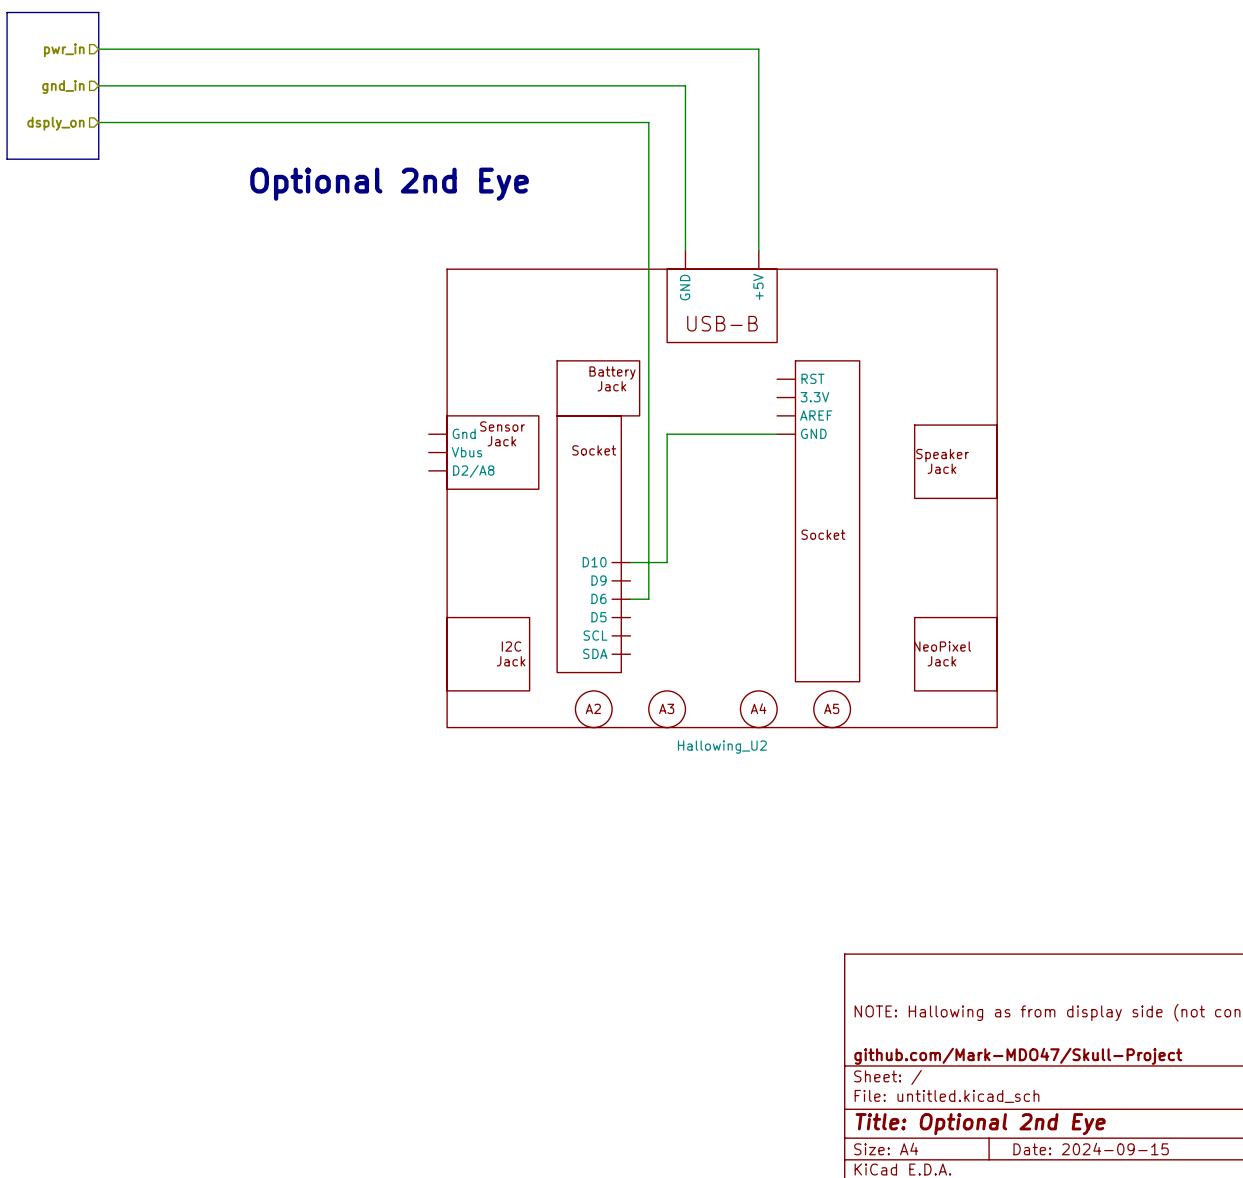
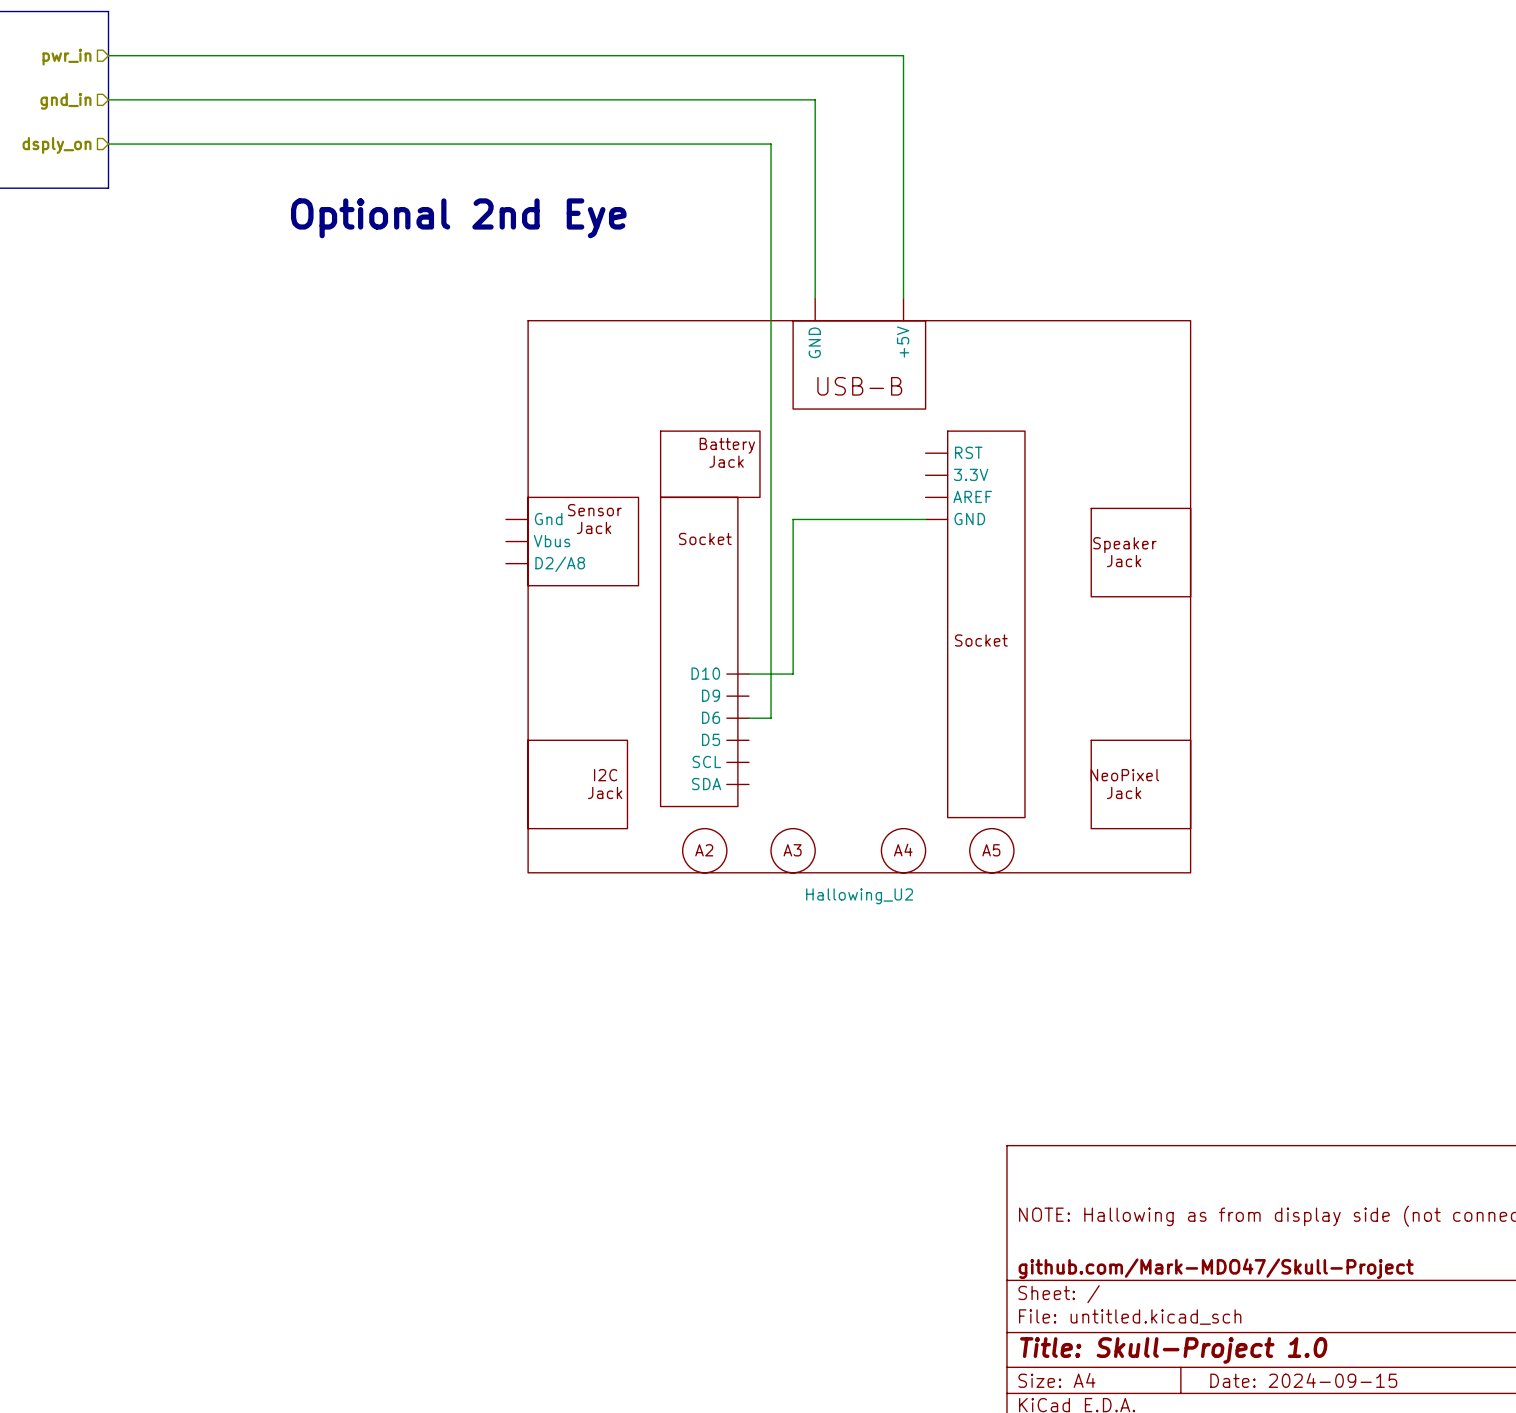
title block: Title: Optional 2nd Eye (980, 1124) -> Title: Skull-Project 1.0 (1173, 1350)

